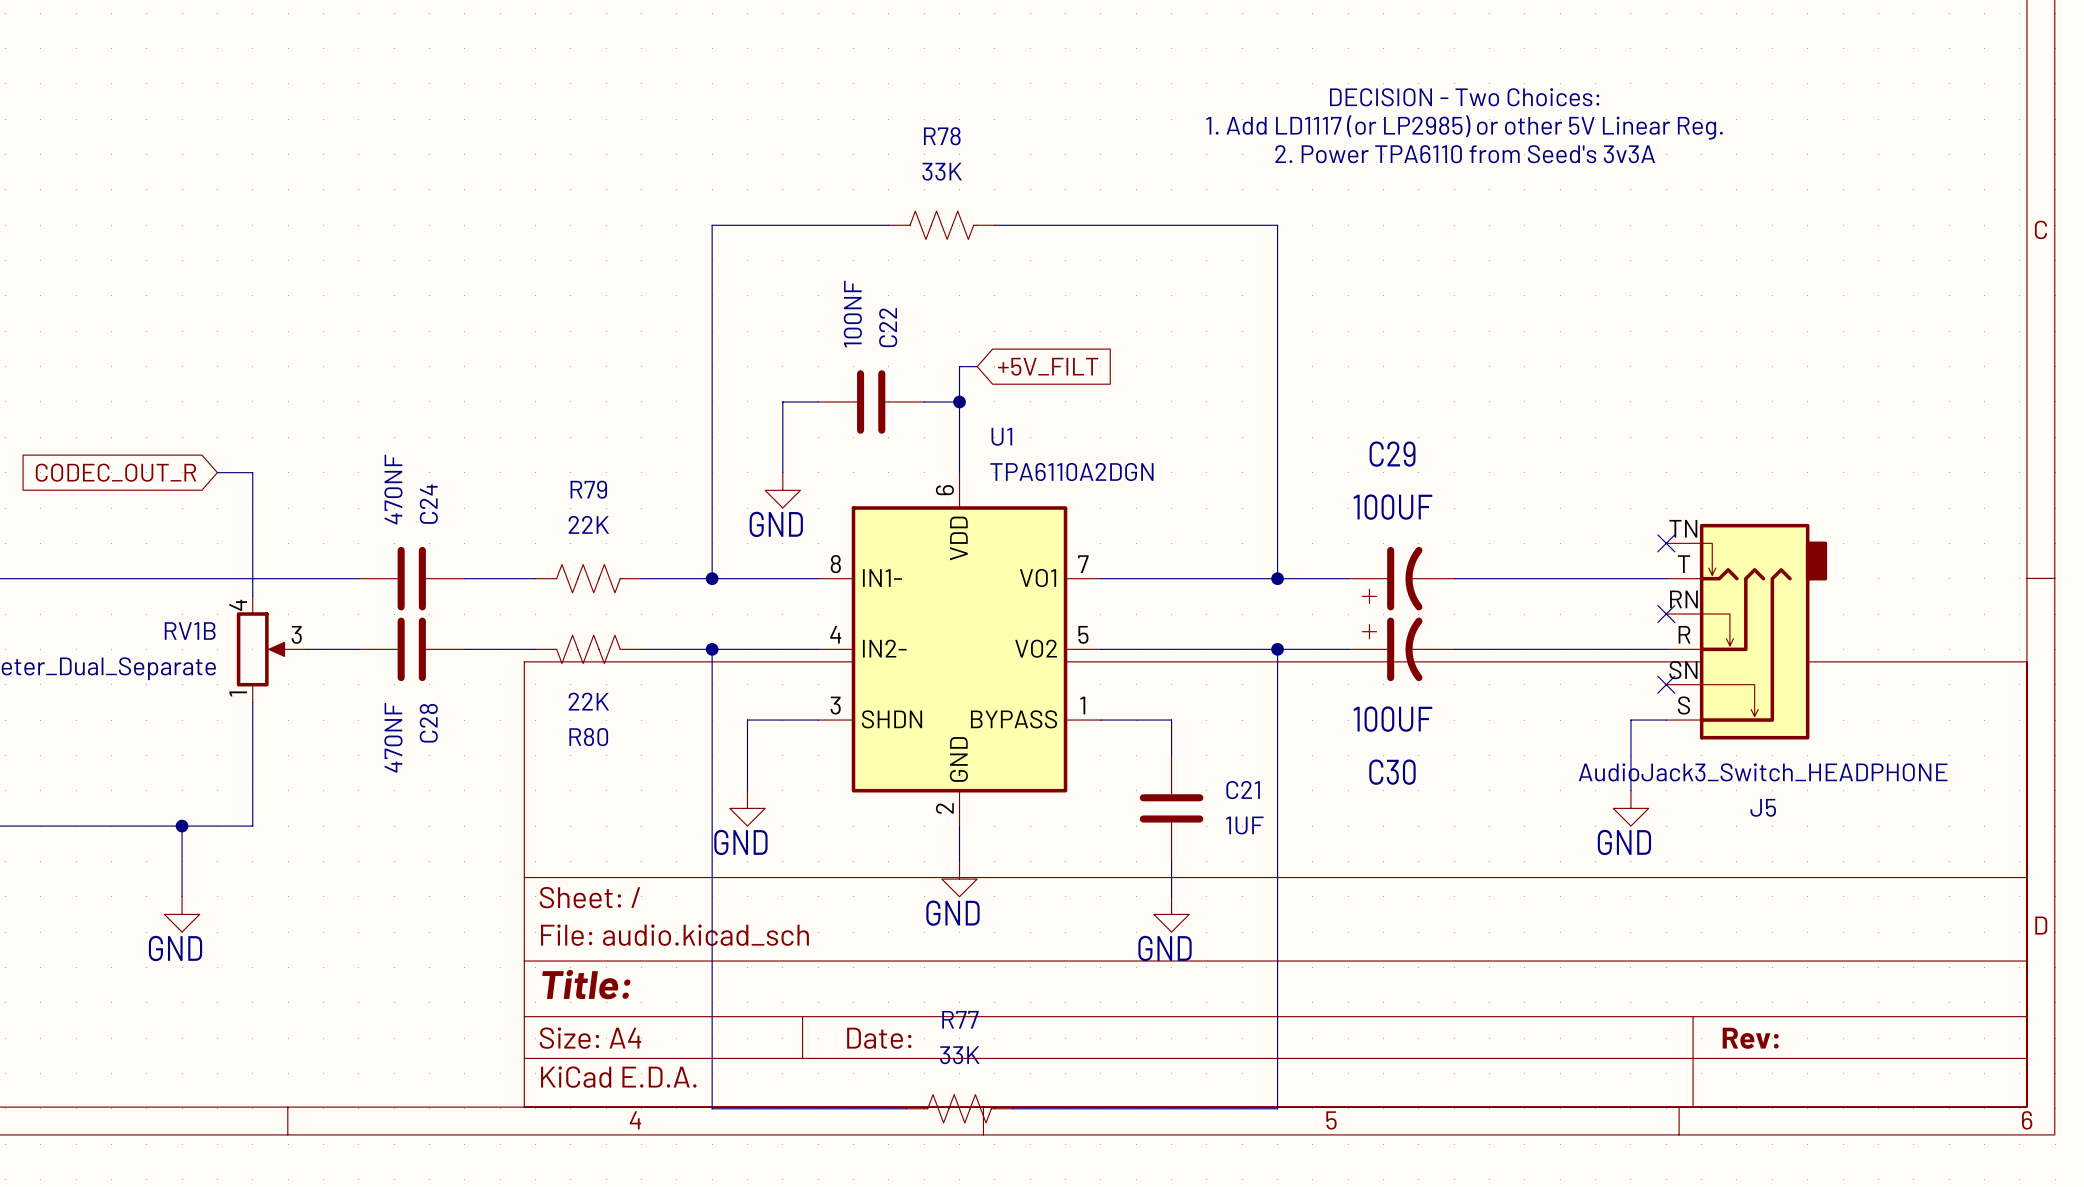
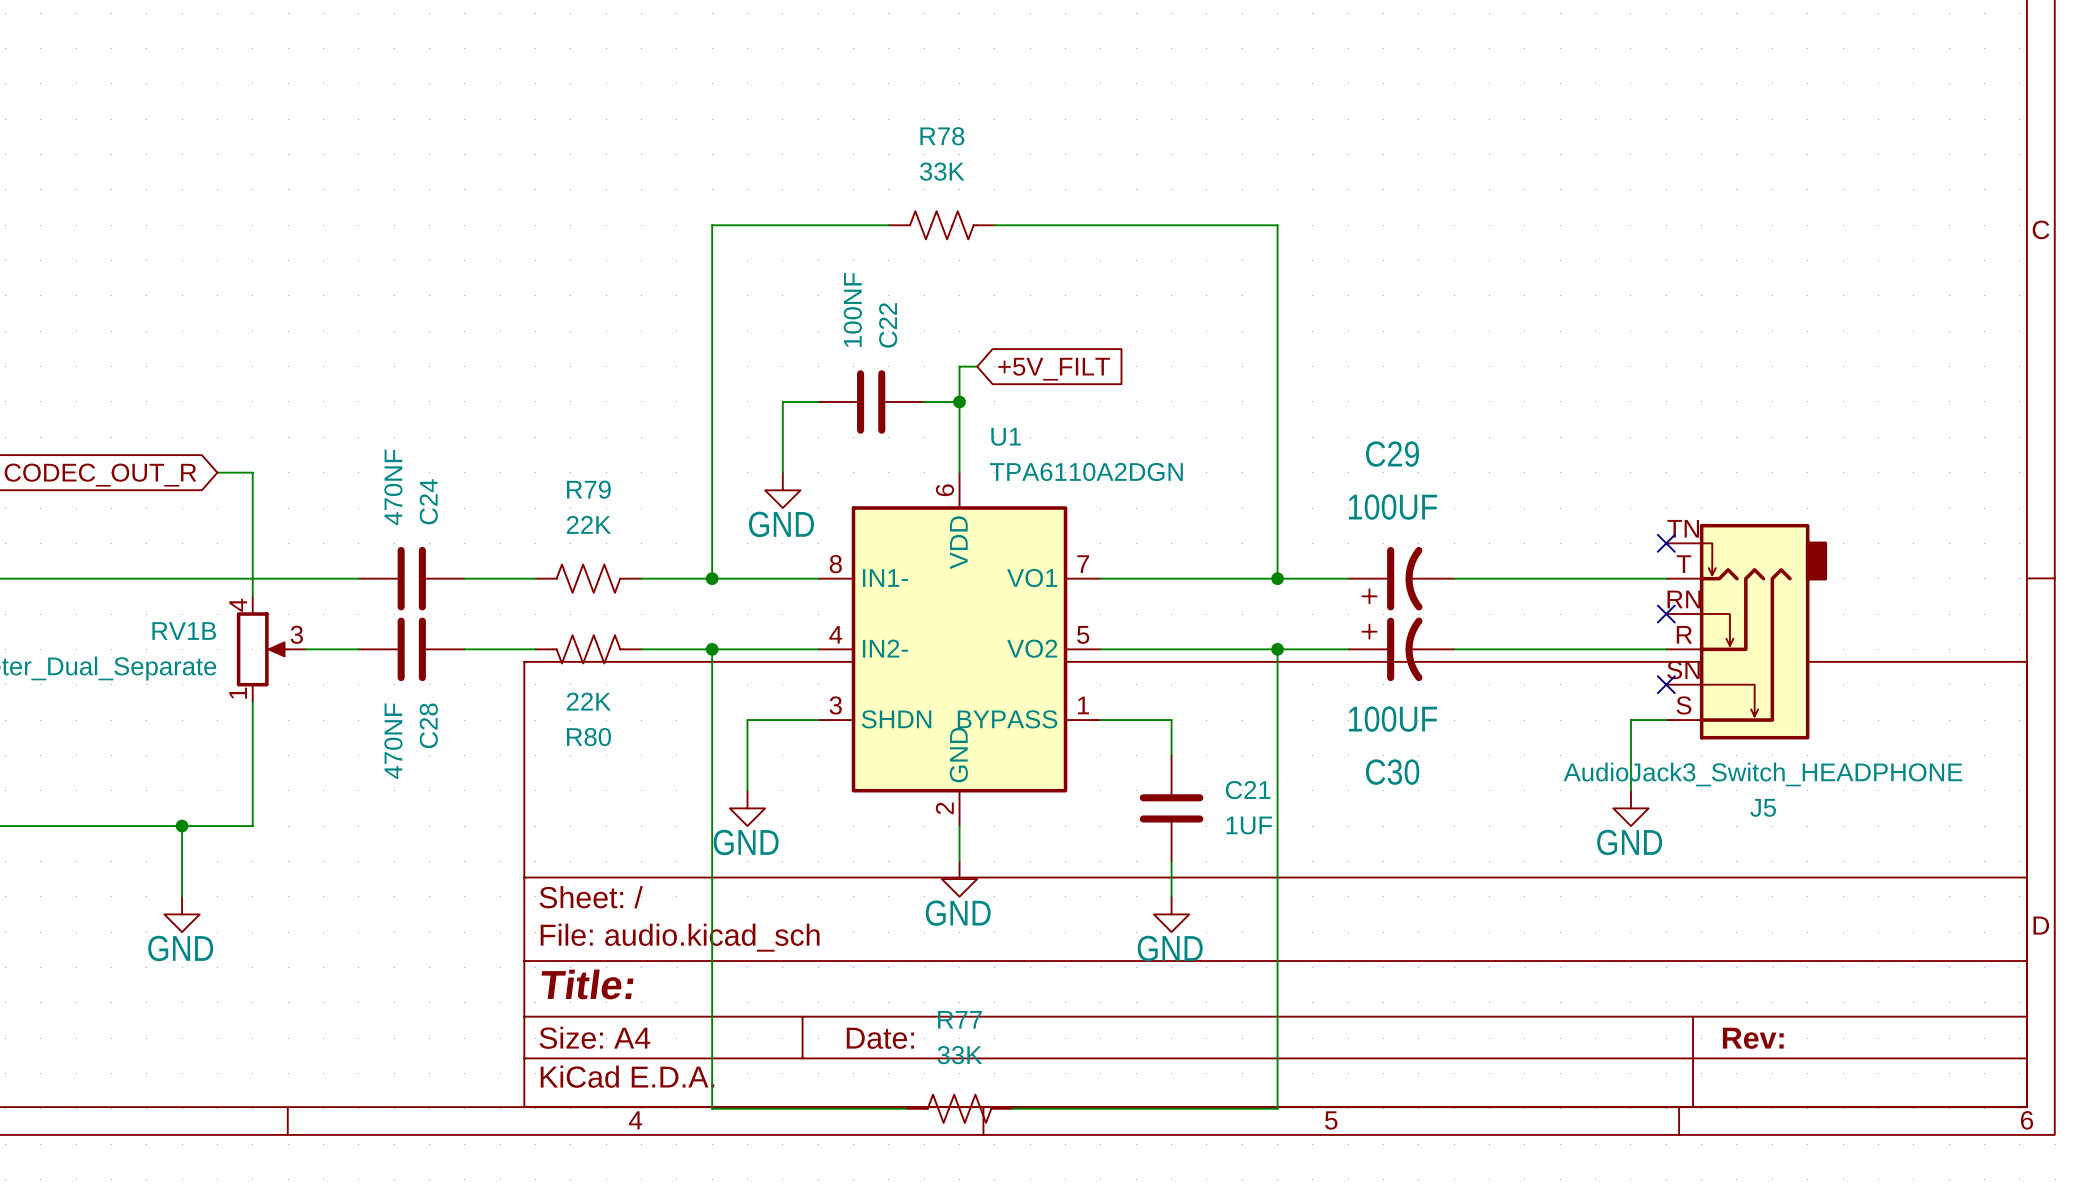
text: DECISION - Two Choices: (1464, 97) -> none
text: 1. Add LD1117 (or LP2985) or other 5V Linear Reg. (1464, 127) -> none
text: 2. Power TPA6110 from Seed's 3v3A (1465, 154) -> none

